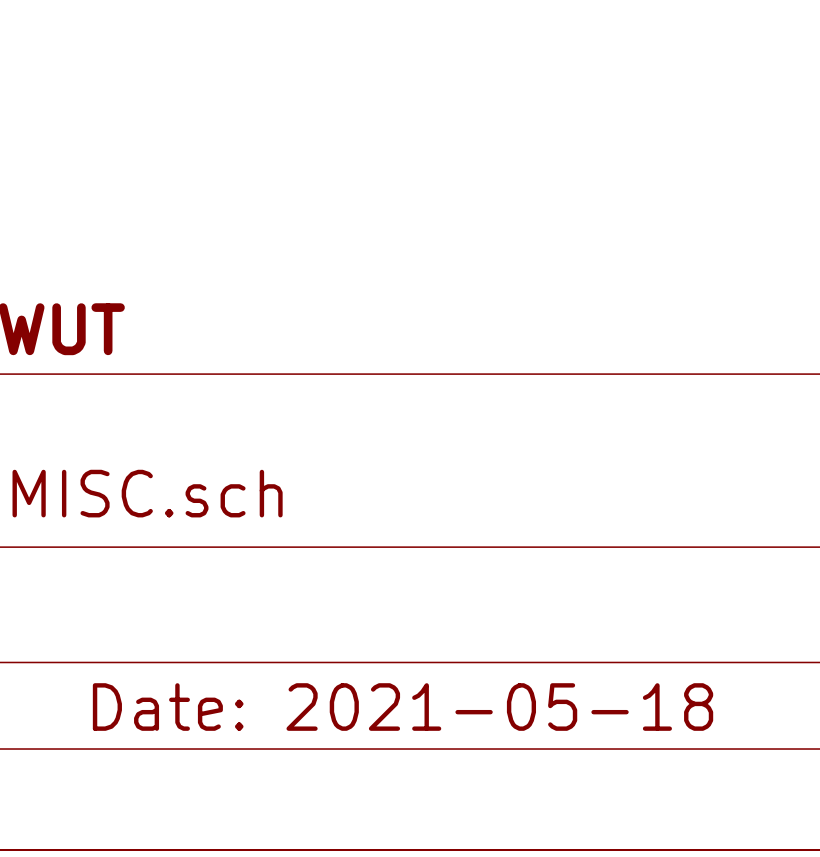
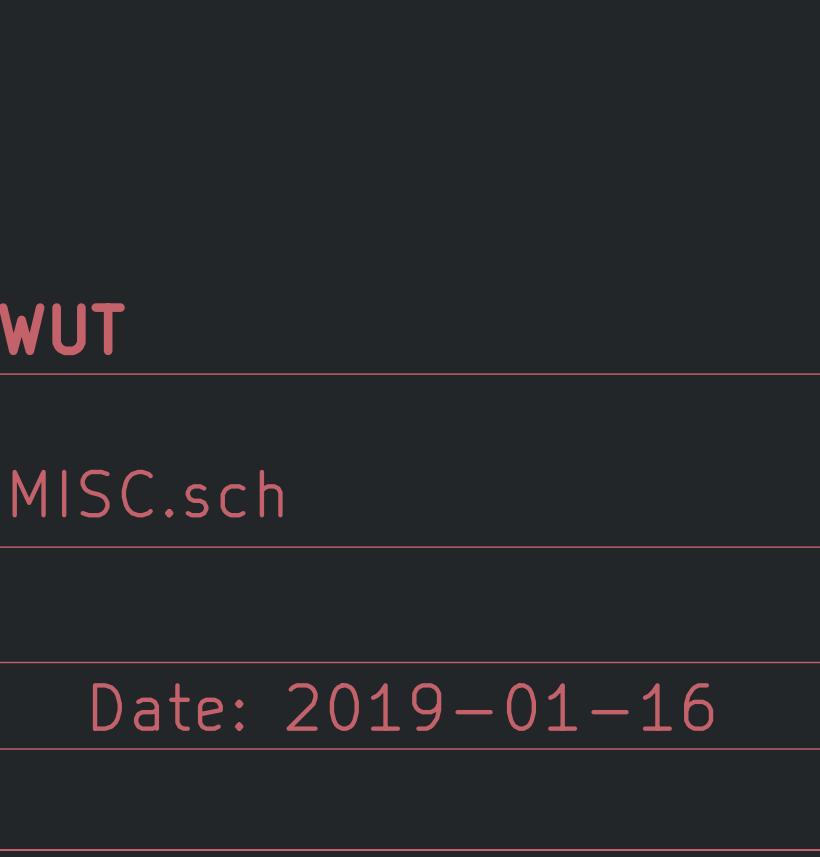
title block: Date: 2021-05-18 (403, 707) -> Date: 2019-01-16 (403, 707)

